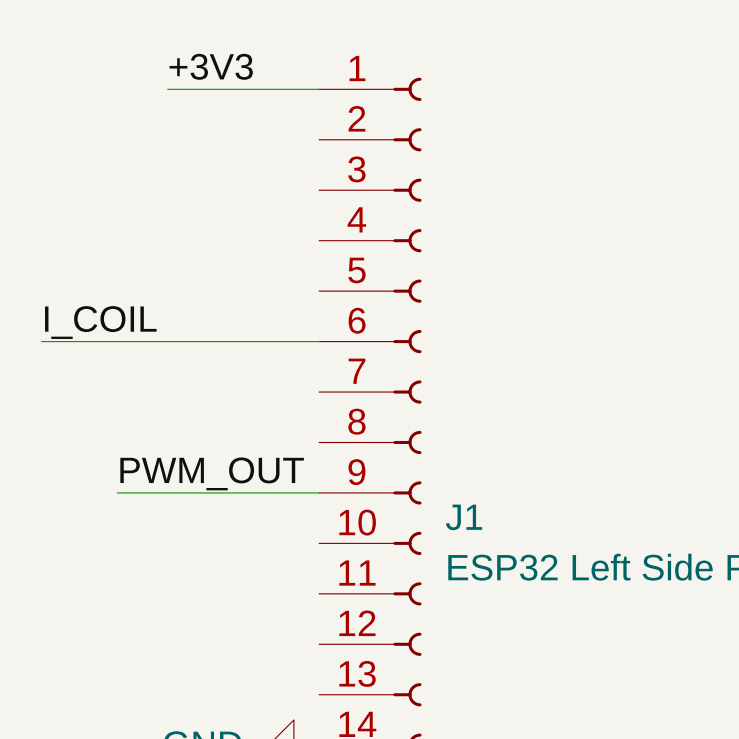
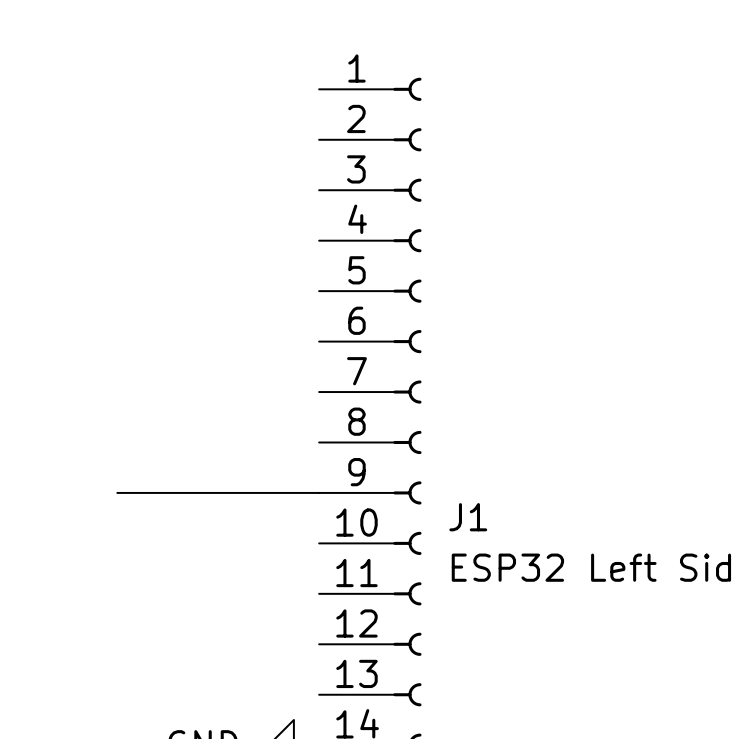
label: +3V3 (211, 66) -> none
wire: (167, 89) (319, 89) -> none
label: I_COIL (100, 322) -> none
wire: (41, 341) (319, 341) -> none
label: PWM_OUT (212, 473) -> none

